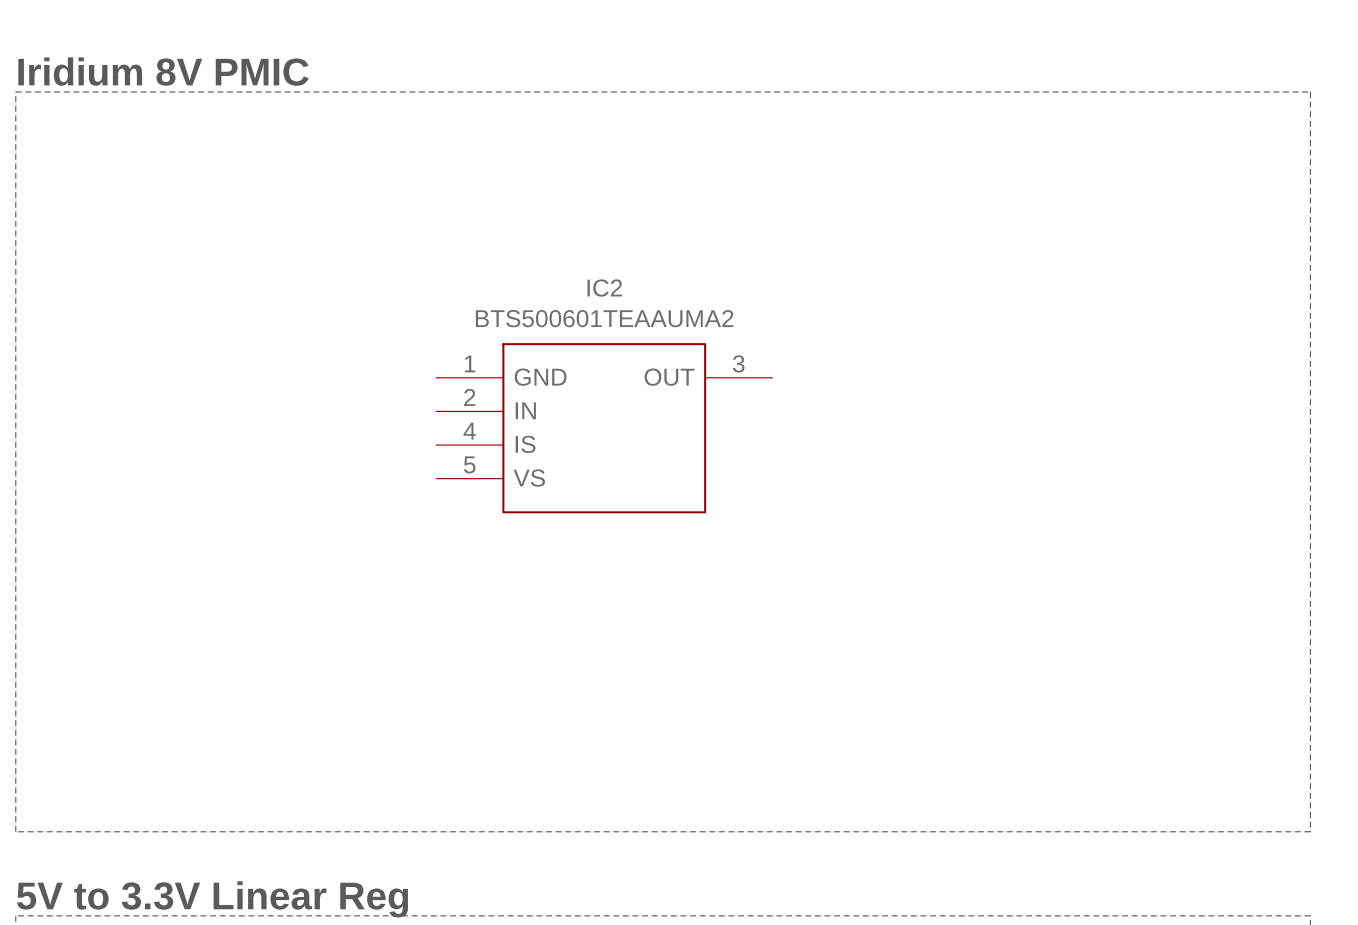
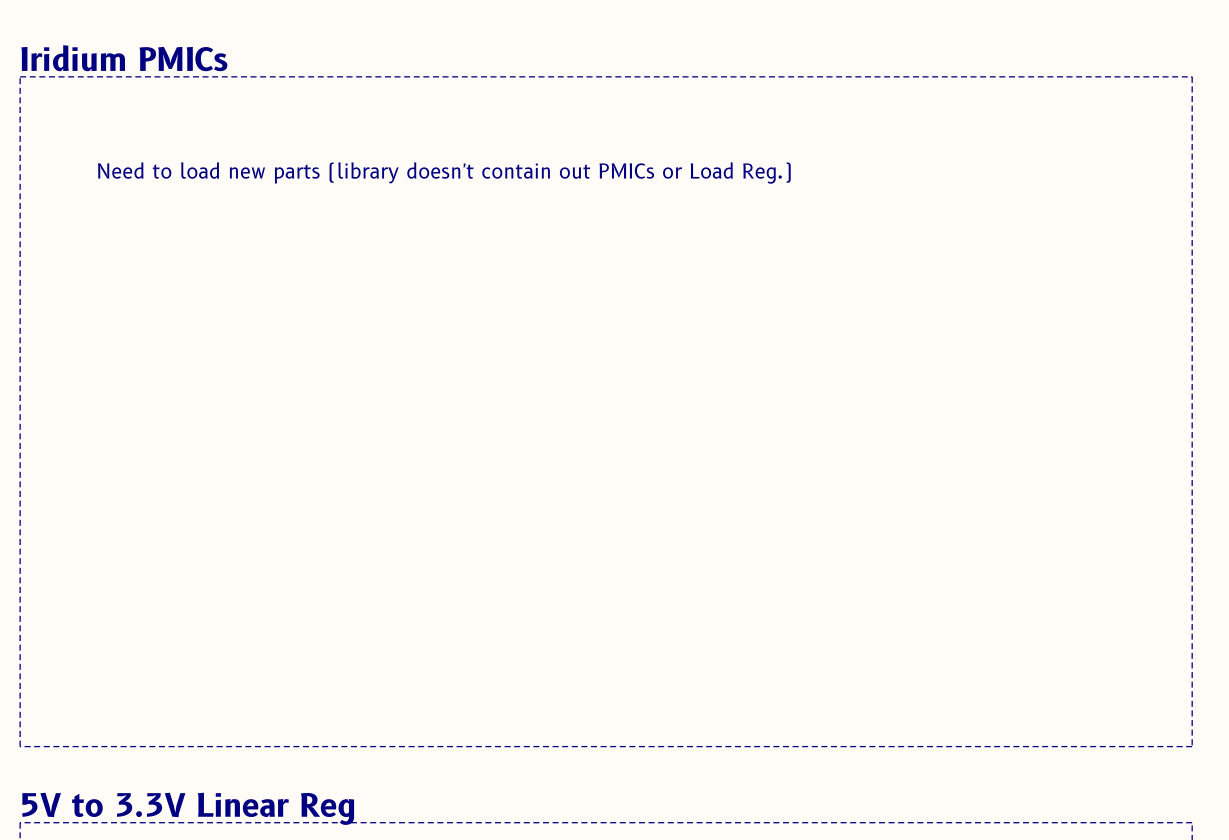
text: Iridium 8V PMIC (163, 71) -> Iridium PMICs (124, 58)
text: none -> Need to load new parts (library doesn't contain out PMICs or Load Reg.) (444, 173)
IC2: BTS500601TEAAUMA2 (604, 428) -> none

